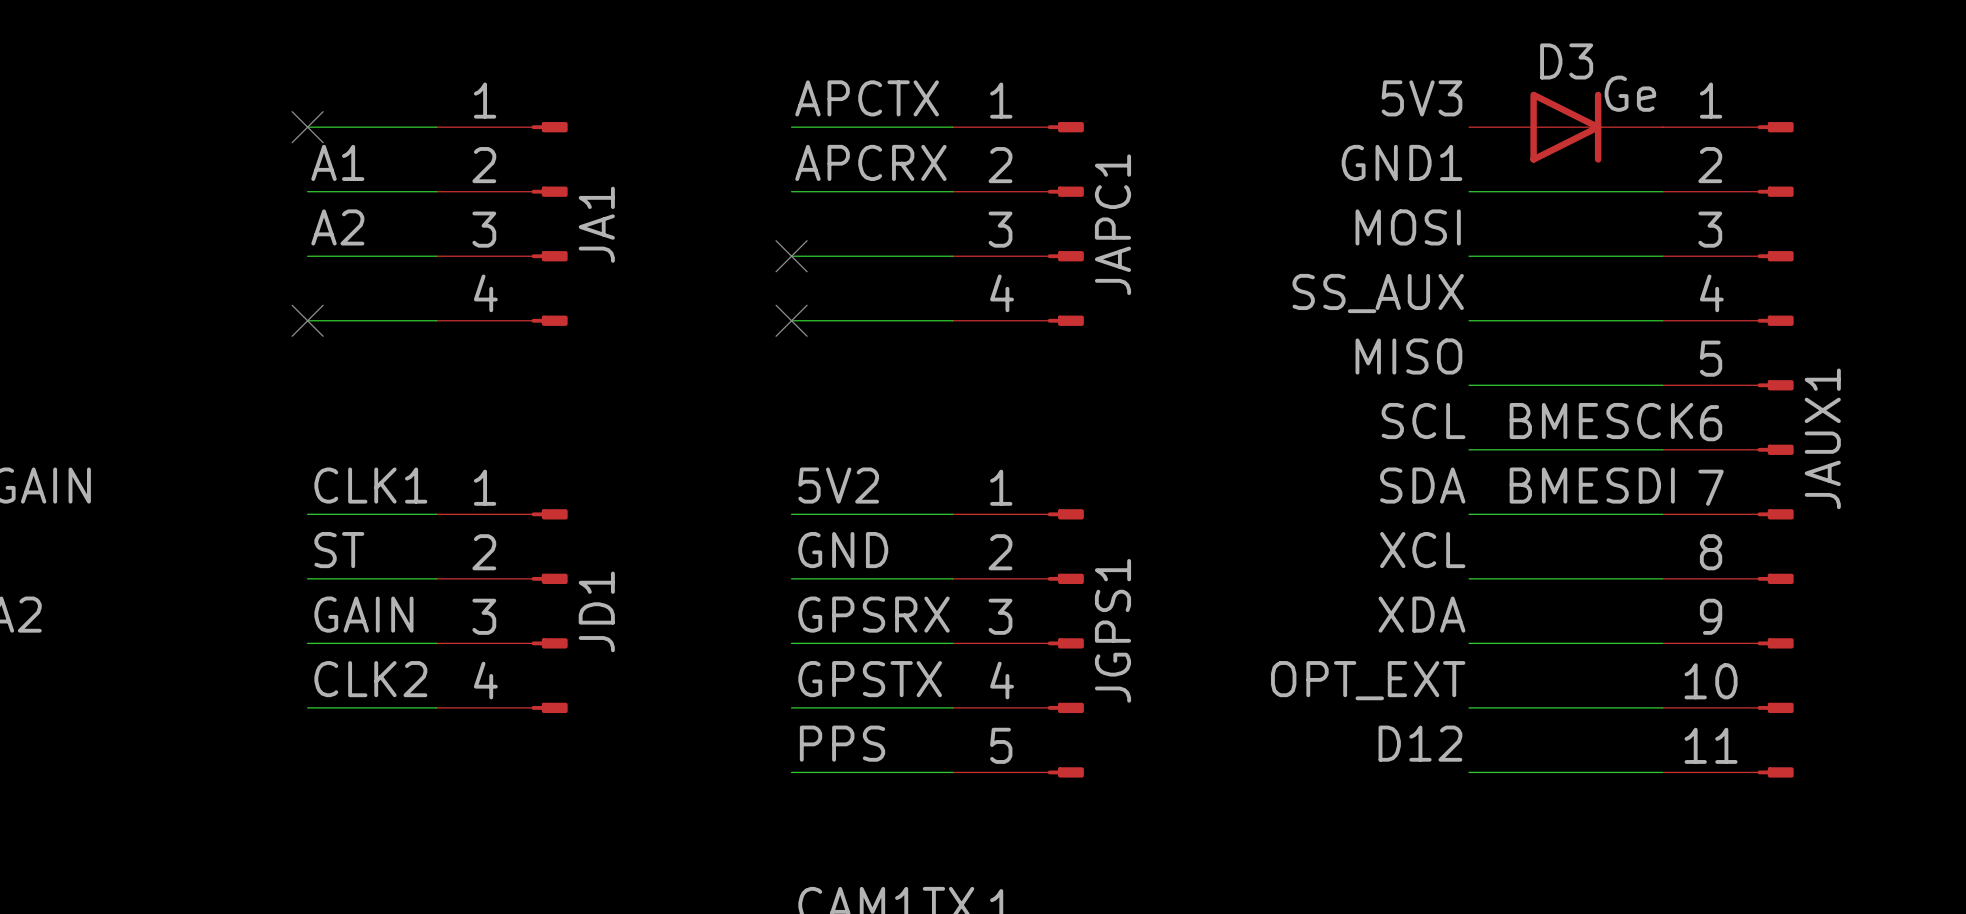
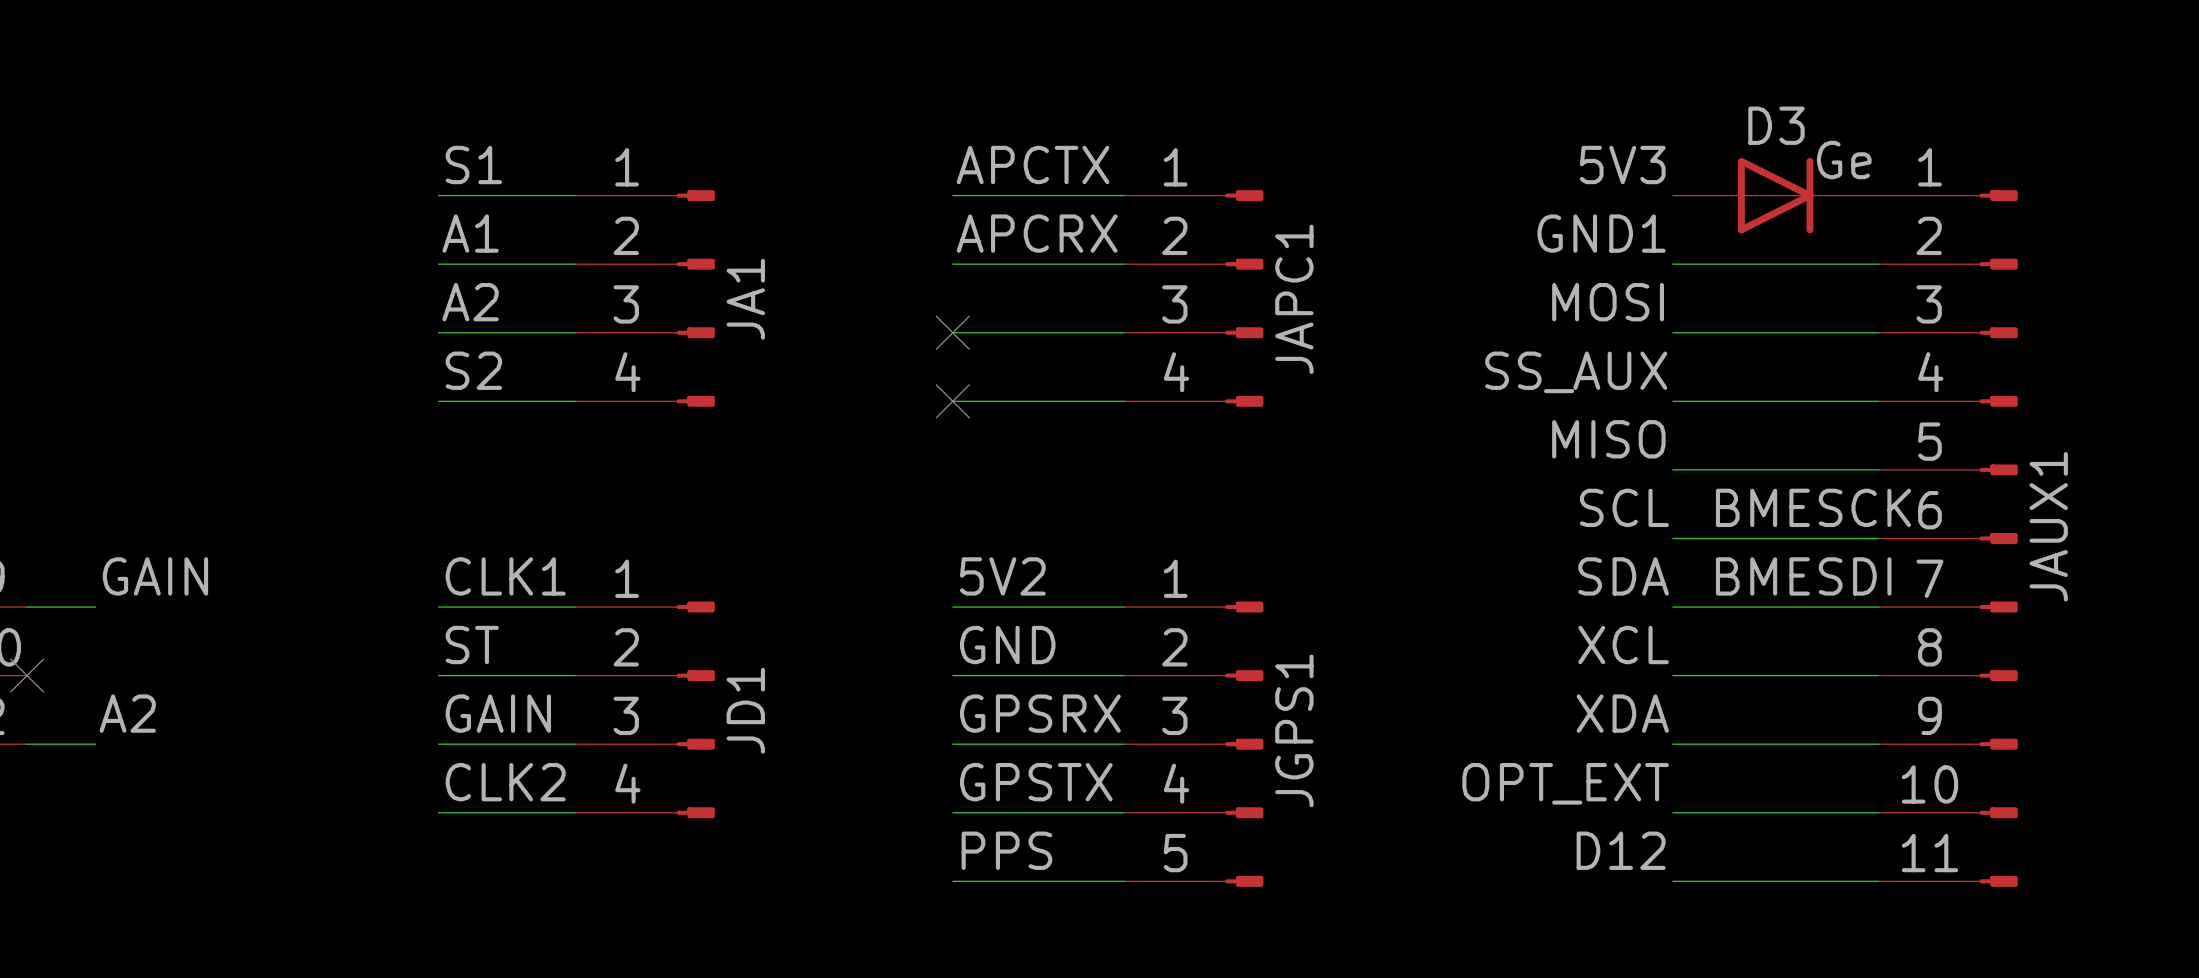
label: none -> S1 (473, 165)
no-connect mark: (307, 127) -> none
label: none -> S2 (473, 370)
no-connect mark: (307, 320) -> none

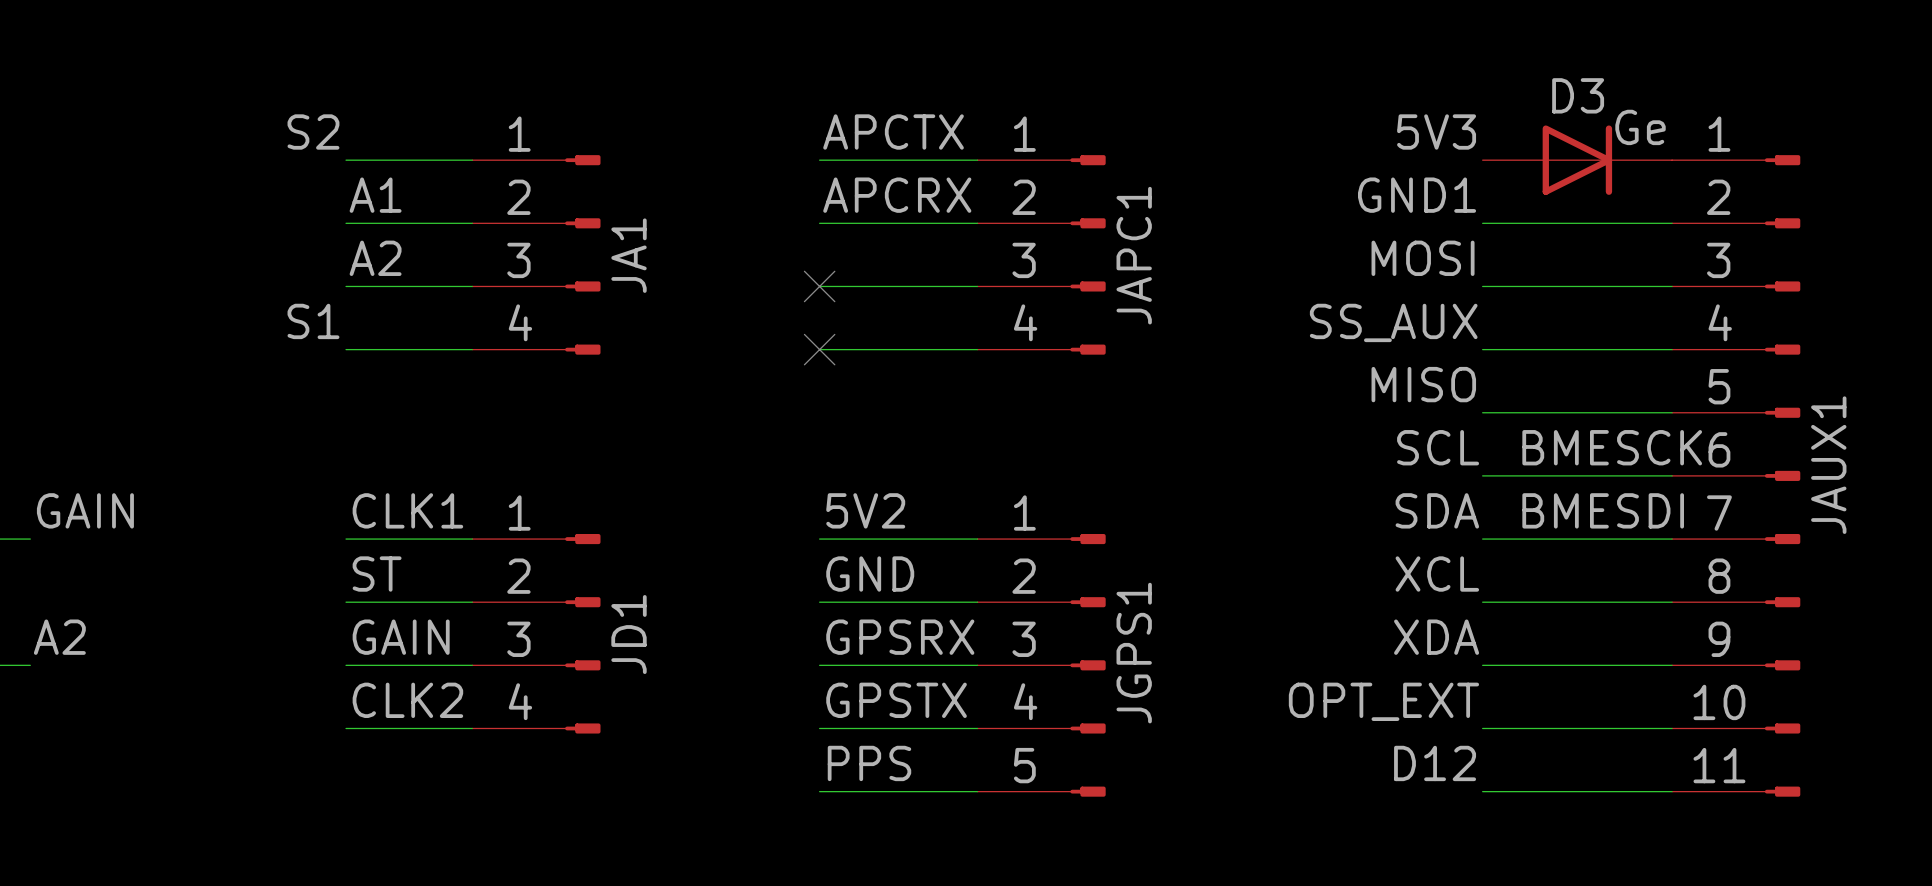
label: S1 (473, 165) -> S2 (313, 132)
label: S2 (473, 370) -> S1 (313, 321)

